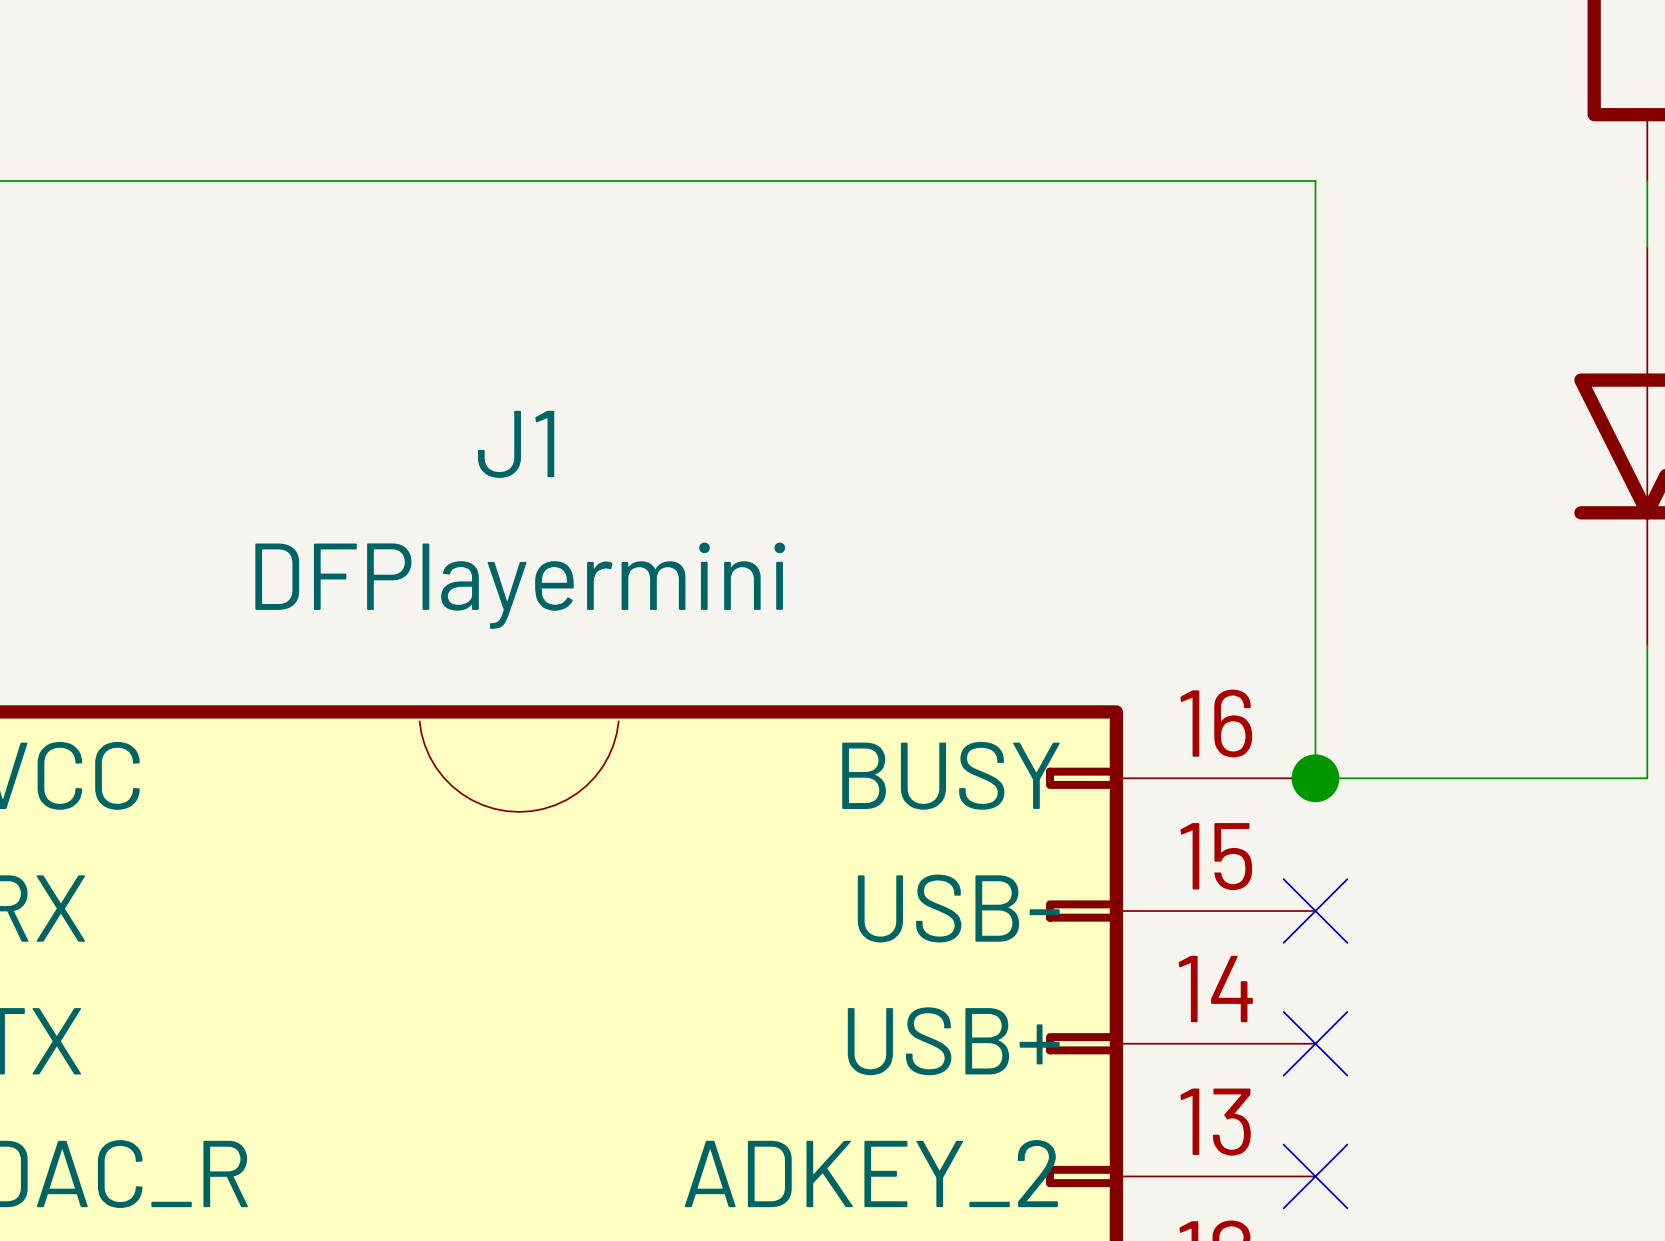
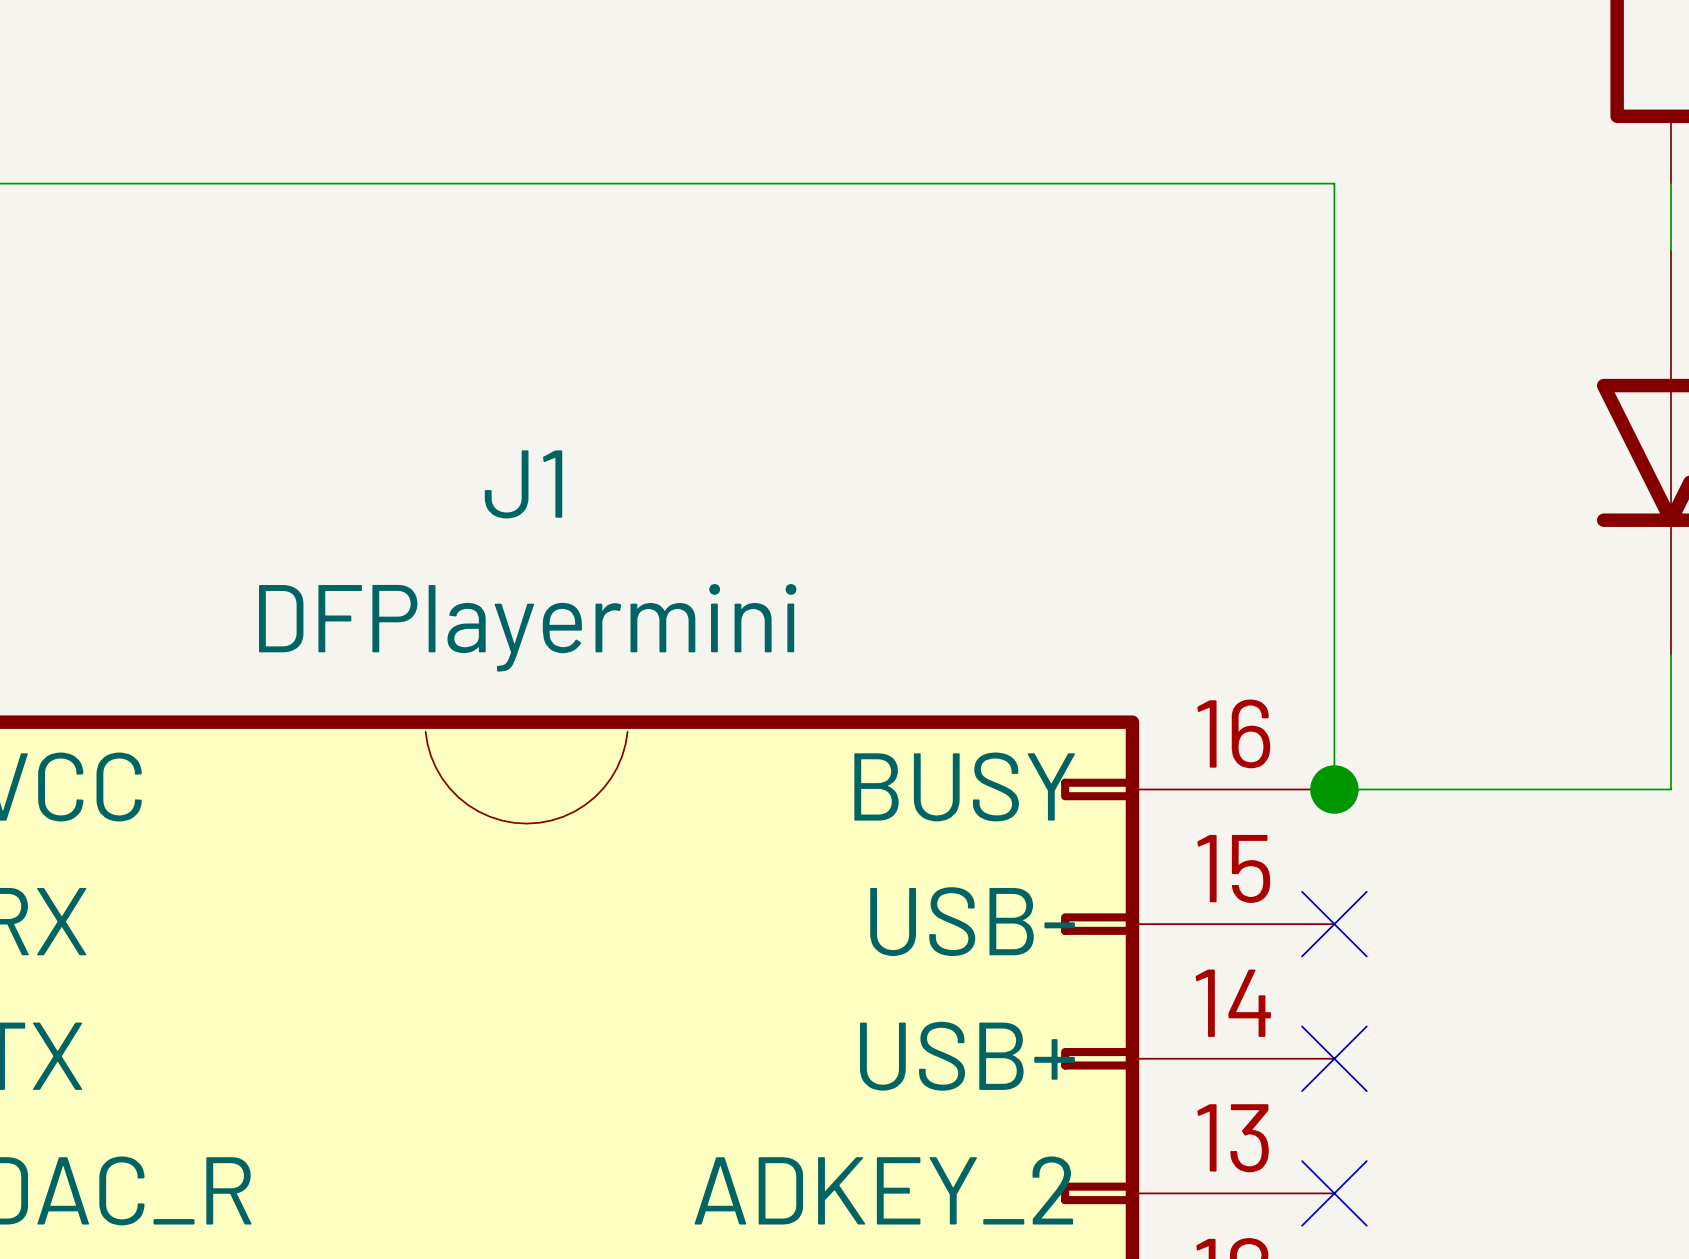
J1 name position: J1 (516, 444) -> J1 (523, 484)
J1 value position: DFPlayermini (520, 585) -> DFPlayermini (527, 627)

